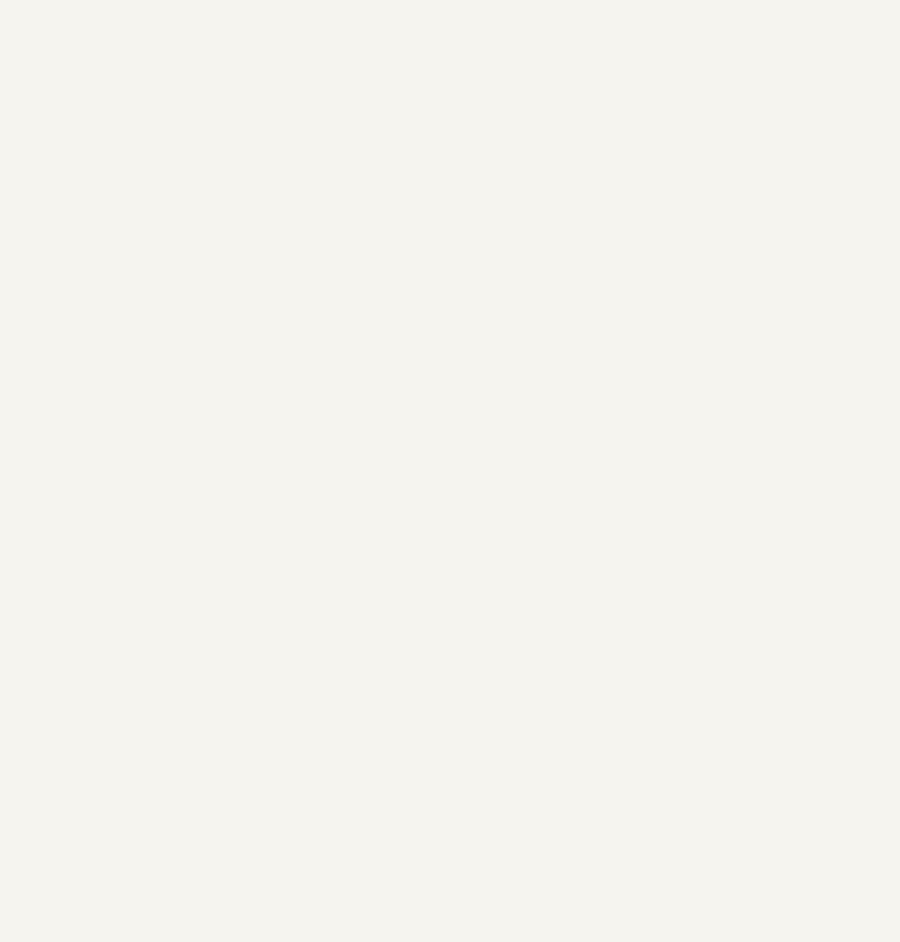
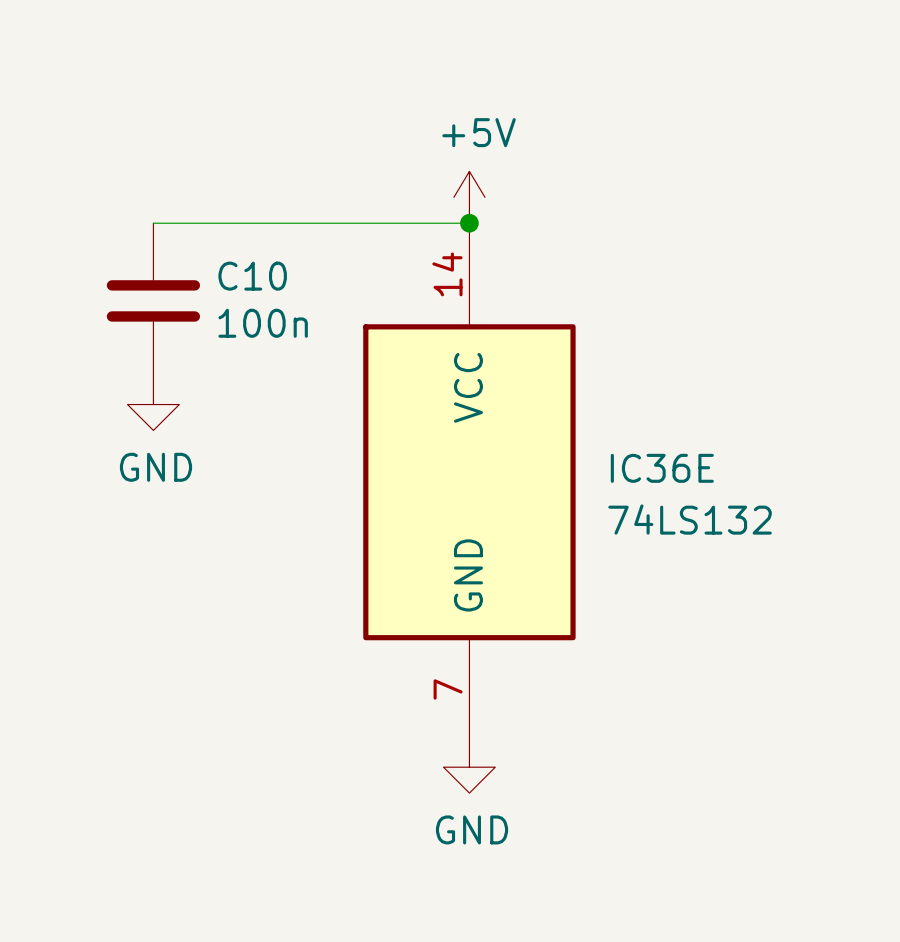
power symbol: none -> +5V (469, 197)
wire: none -> (153, 223) (469, 223)
junction: none -> (469, 223)
C10: none -> 100n (153, 300)
power symbol: none -> GND (153, 404)
IC36E: none -> 74LS132 (469, 482)
power symbol: none -> GND (469, 767)

